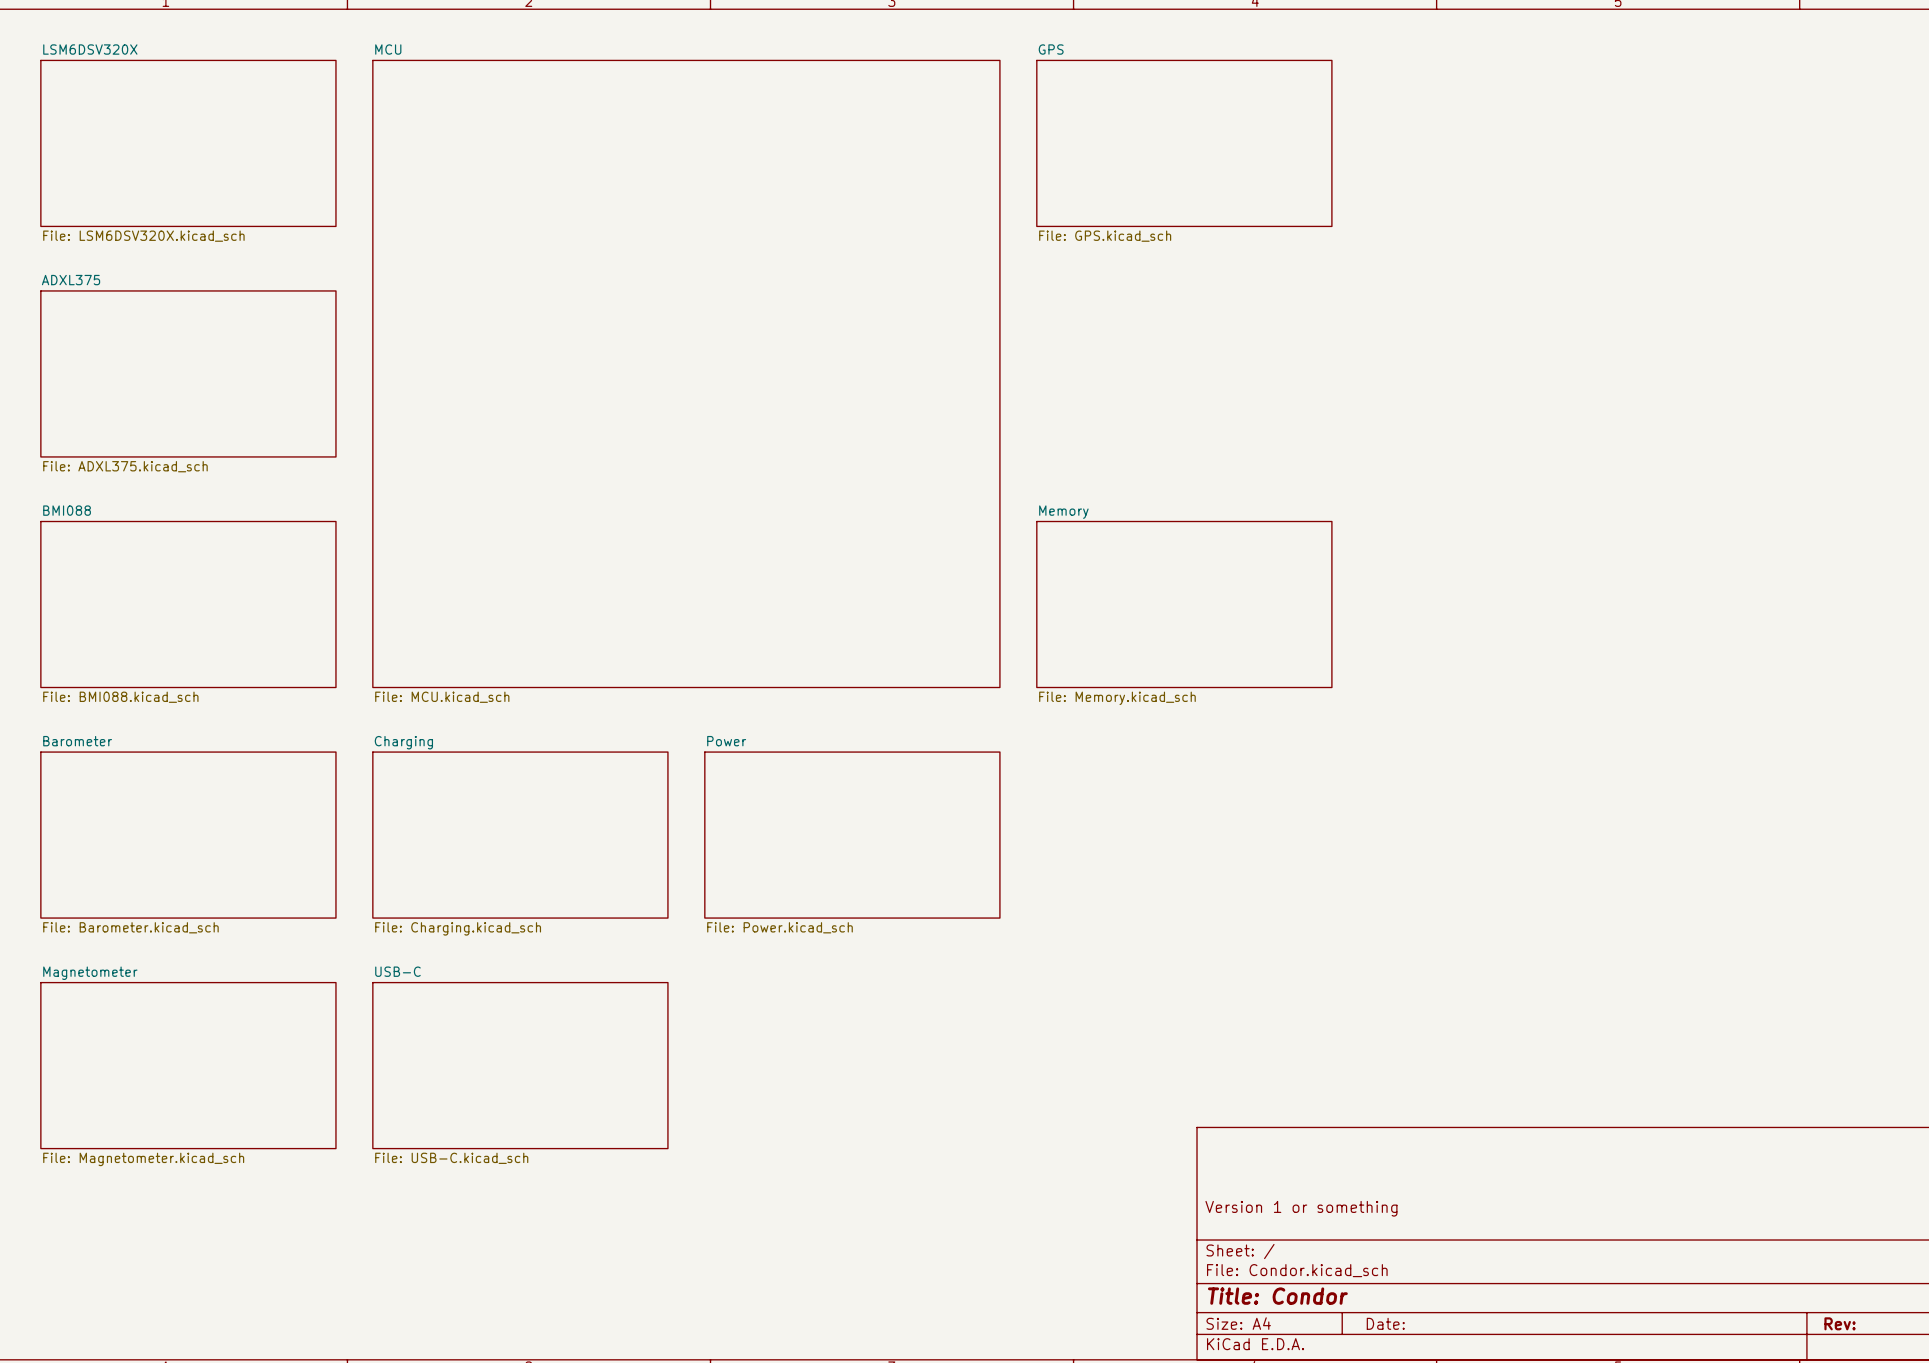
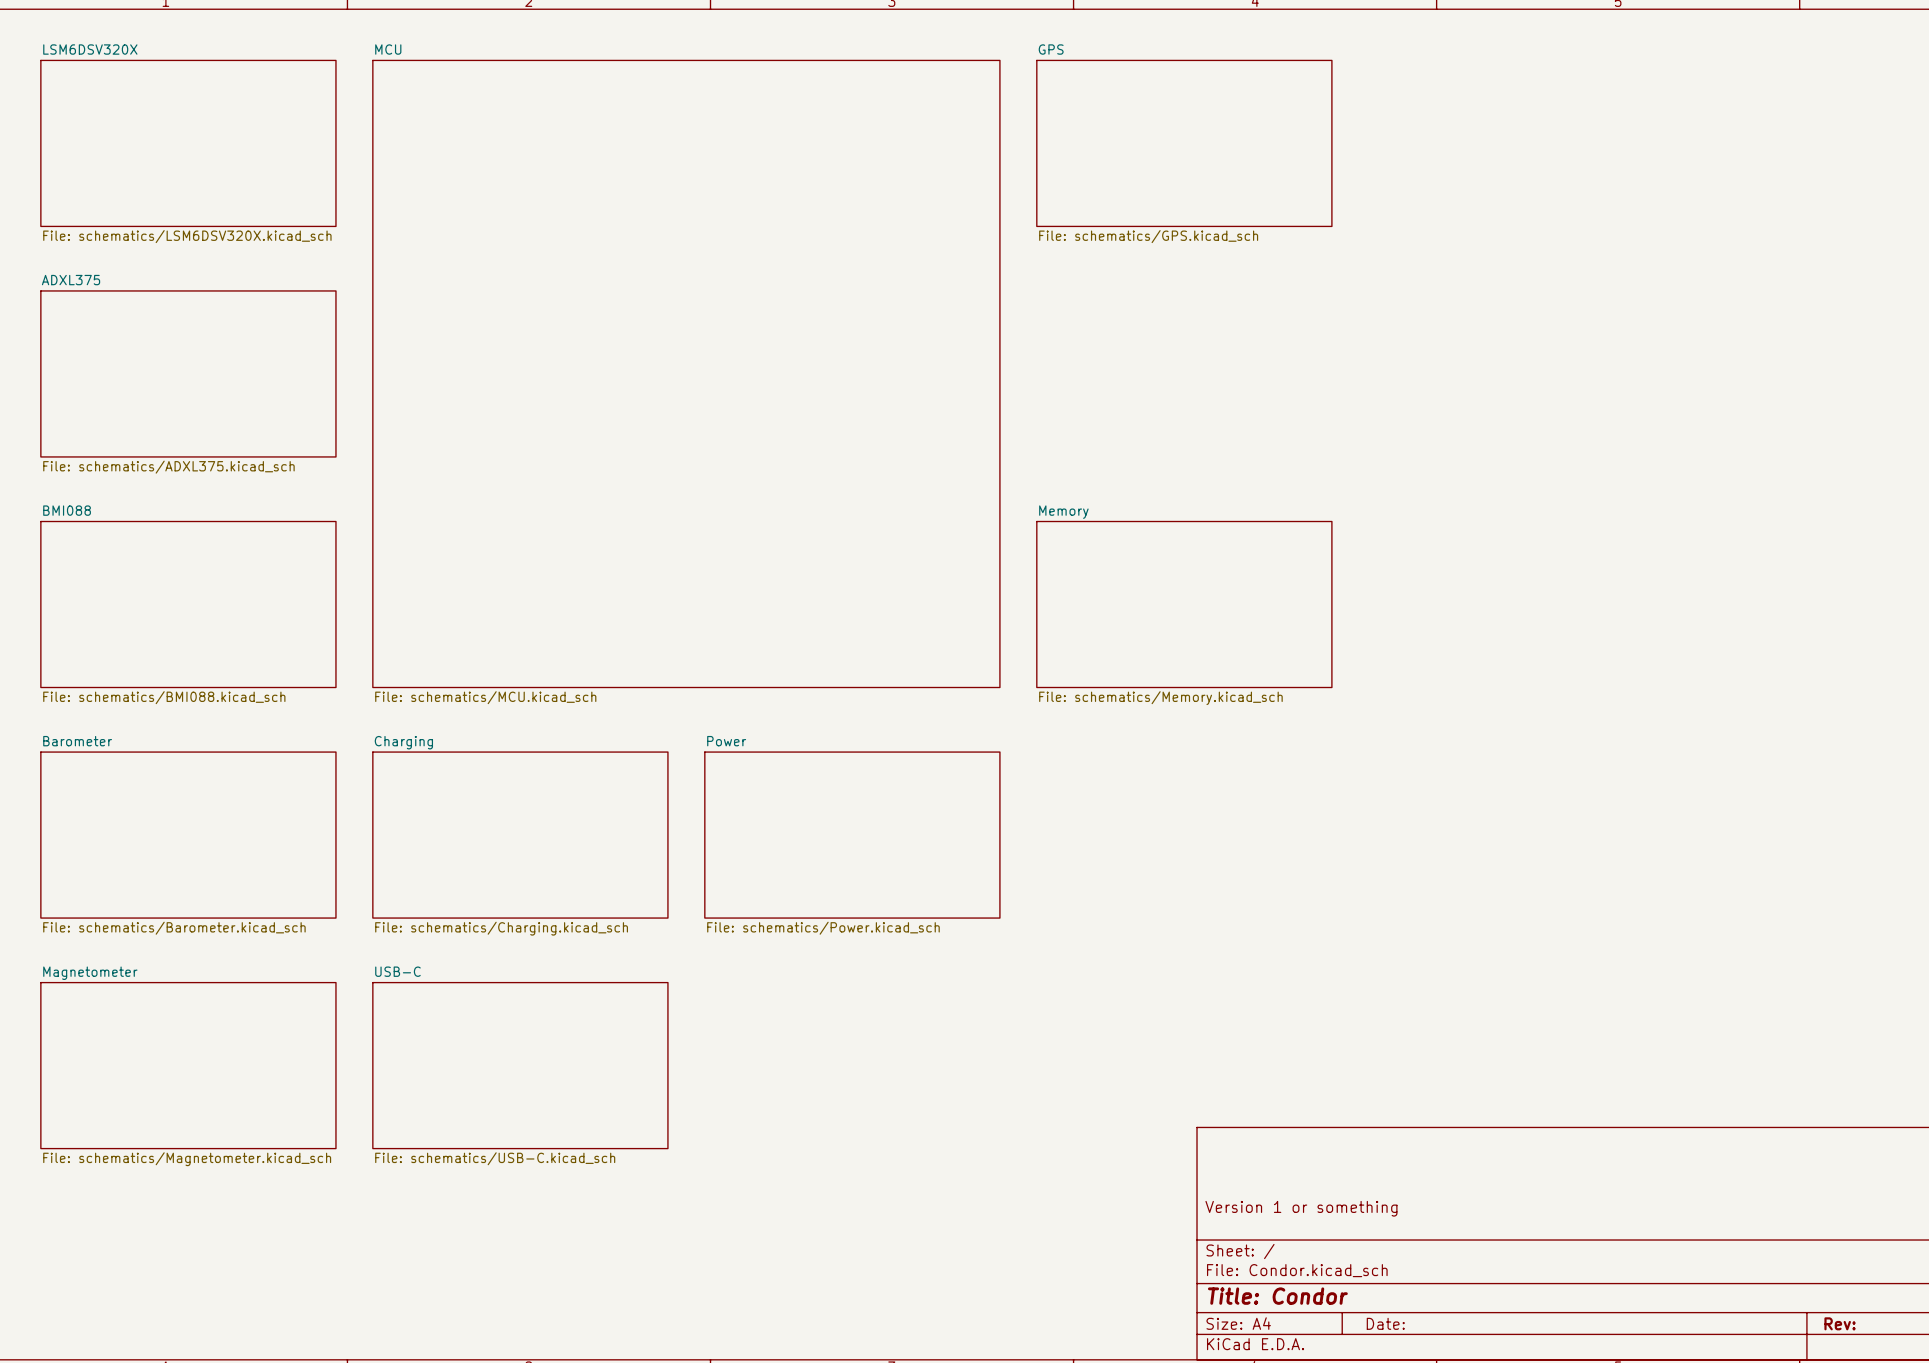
sheet LSM6DSV320X value: File: LSM6DSV320X.kicad_sch (143, 236) -> File: schematics/LSM6DSV320X.kicad_sch (187, 236)
sheet GPS value: File: GPS.kicad_sch (1105, 236) -> File: schematics/GPS.kicad_sch (1148, 236)
sheet ADXL375 value: File: ADXL375.kicad_sch (125, 466) -> File: schematics/ADXL375.kicad_sch (168, 467)
sheet BMI088 value: File: BMI088.kicad_sch (120, 697) -> File: schematics/BMI088.kicad_sch (164, 697)
sheet MCU value: File: MCU.kicad_sch (442, 697) -> File: schematics/MCU.kicad_sch (485, 697)
sheet Memory value: File: Memory.kicad_sch (1117, 698) -> File: schematics/Memory.kicad_sch (1160, 698)
sheet Barometer value: File: Barometer.kicad_sch (130, 927) -> File: schematics/Barometer.kicad_sch (174, 928)
sheet Power value: File: Power.kicad_sch (779, 927) -> File: schematics/Power.kicad_sch (823, 928)
sheet Charging value: File: Charging.kicad_sch (458, 928) -> File: schematics/Charging.kicad_sch (501, 928)
sheet USB-C value: File: USB-C.kicad_sch (451, 1158) -> File: schematics/USB-C.kicad_sch (495, 1158)
sheet Magnetometer value: File: Magnetometer.kicad_sch (143, 1159) -> File: schematics/Magnetometer.kicad_sch (187, 1159)

